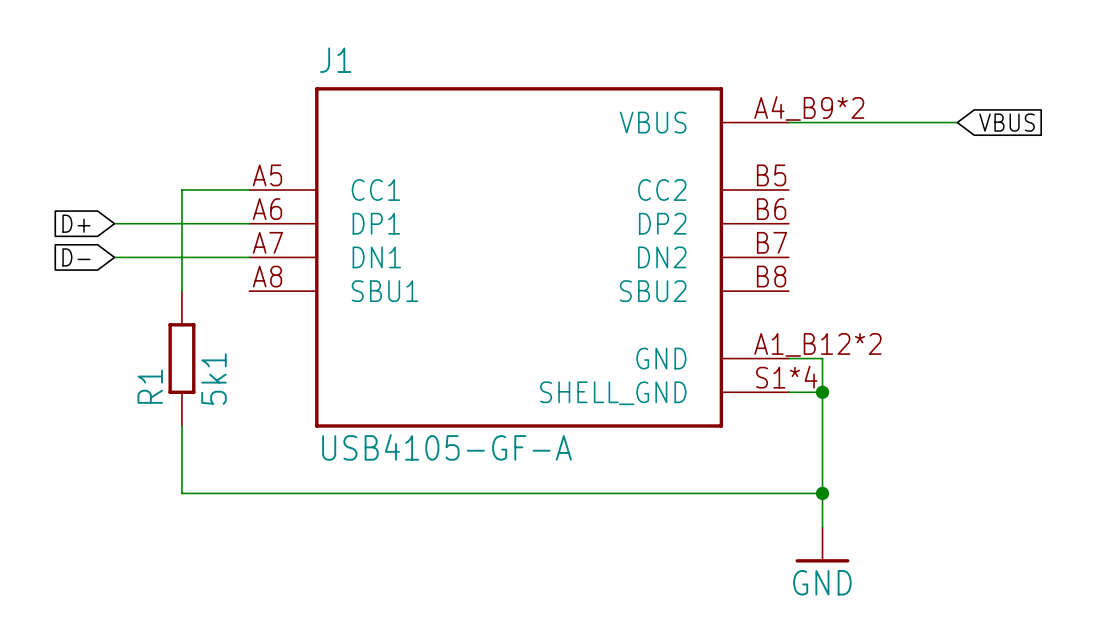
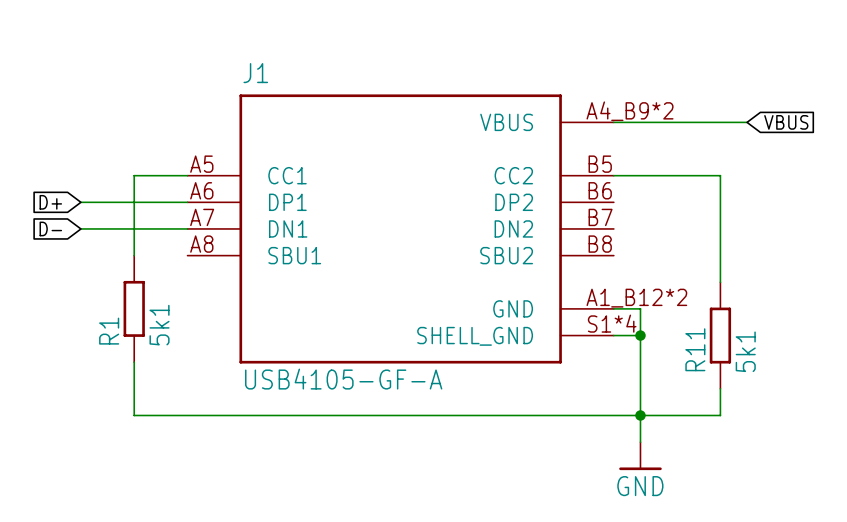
wire: none -> (613, 175) (720, 175) (720, 282)
R11: none -> 5k1 (720, 335)
wire: none -> (720, 388) (720, 415) (640, 415)

